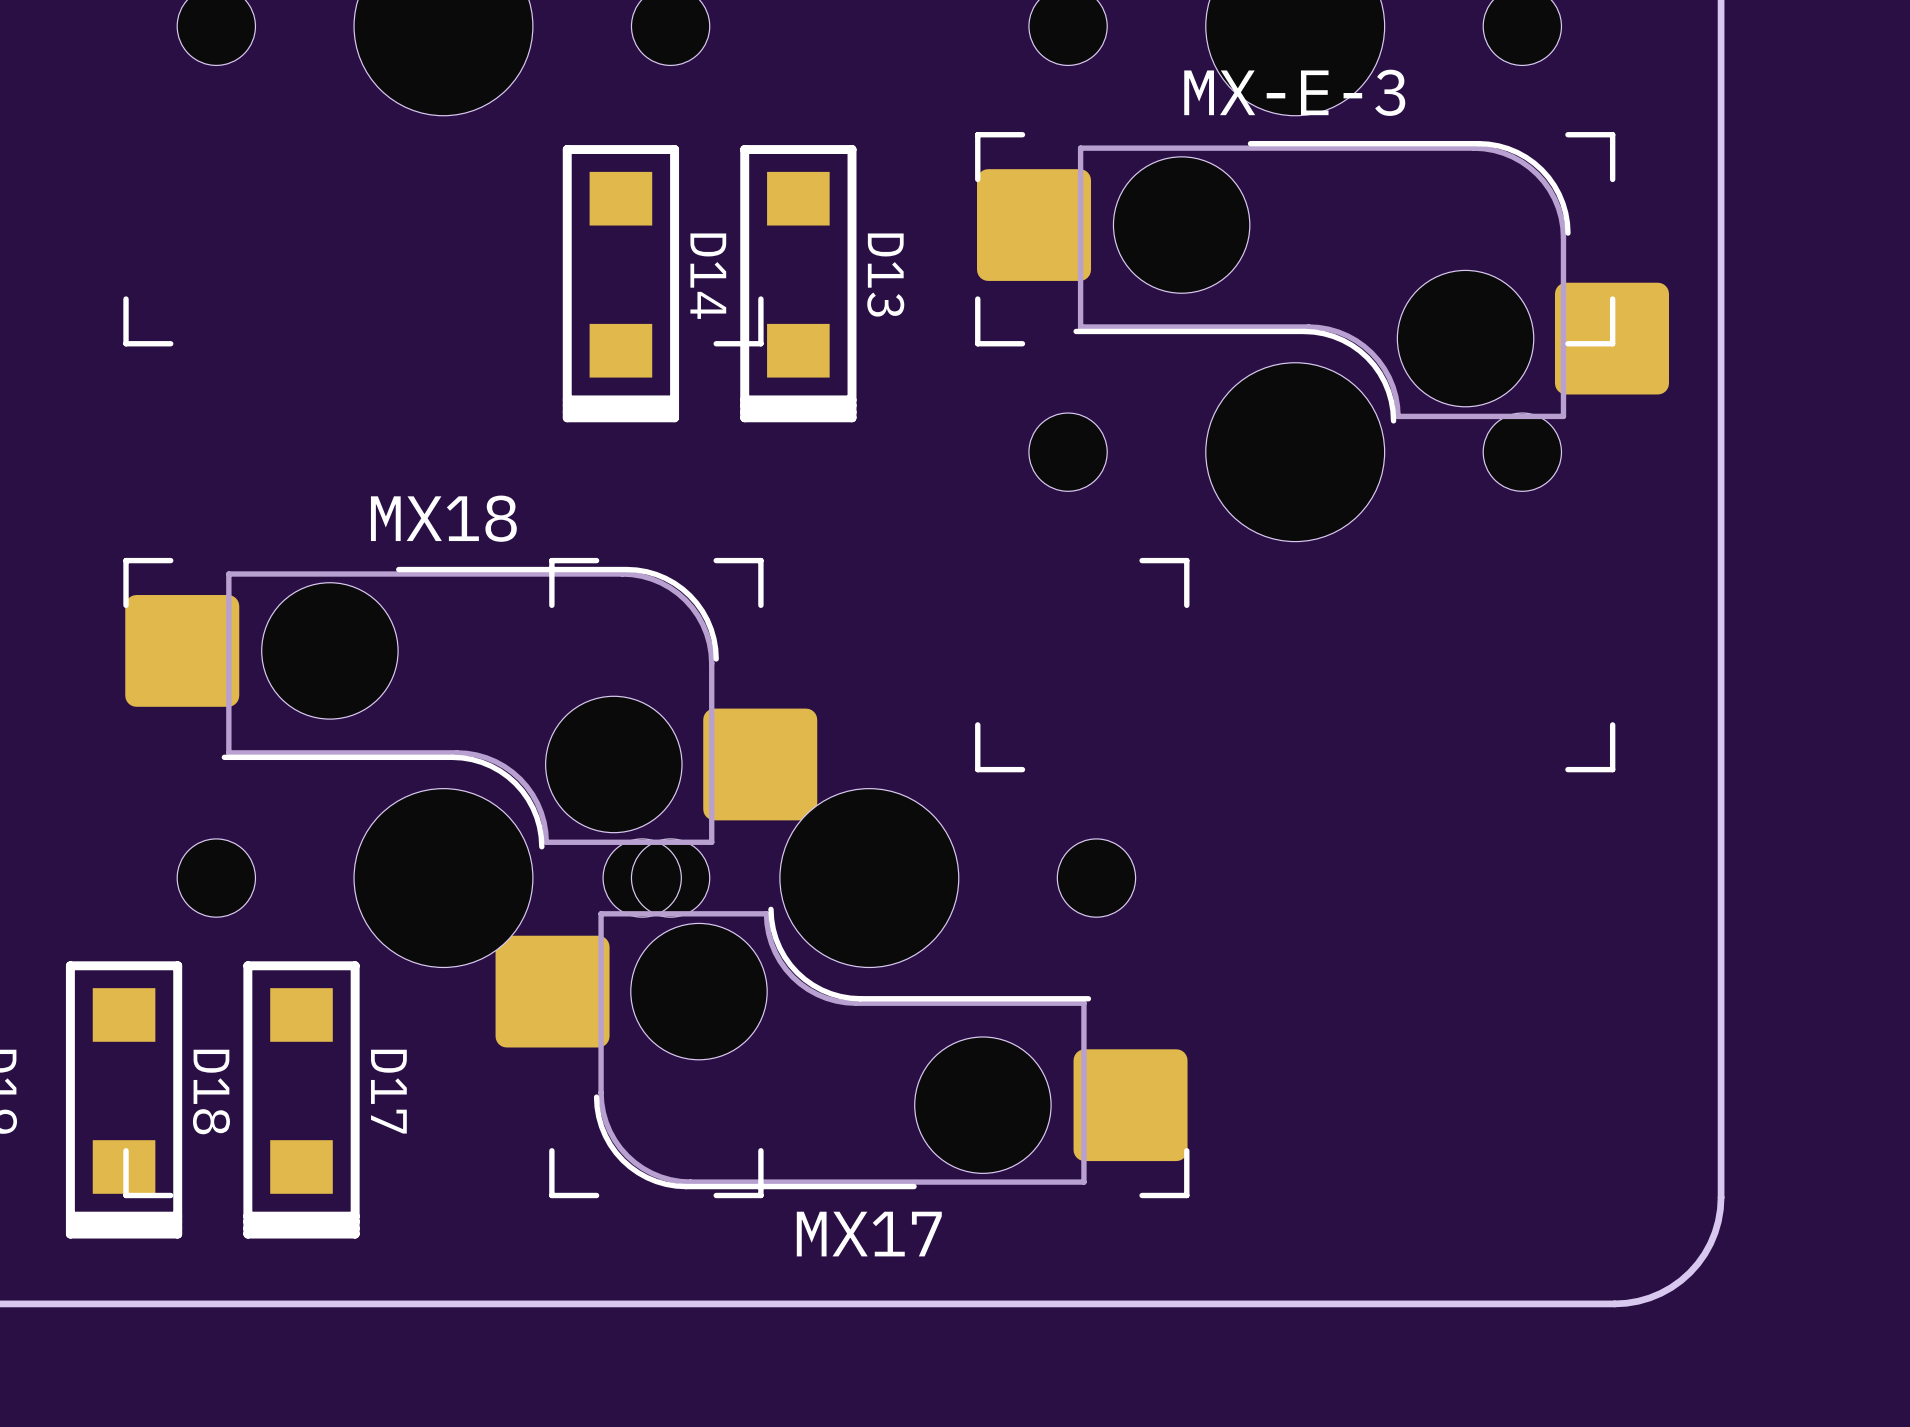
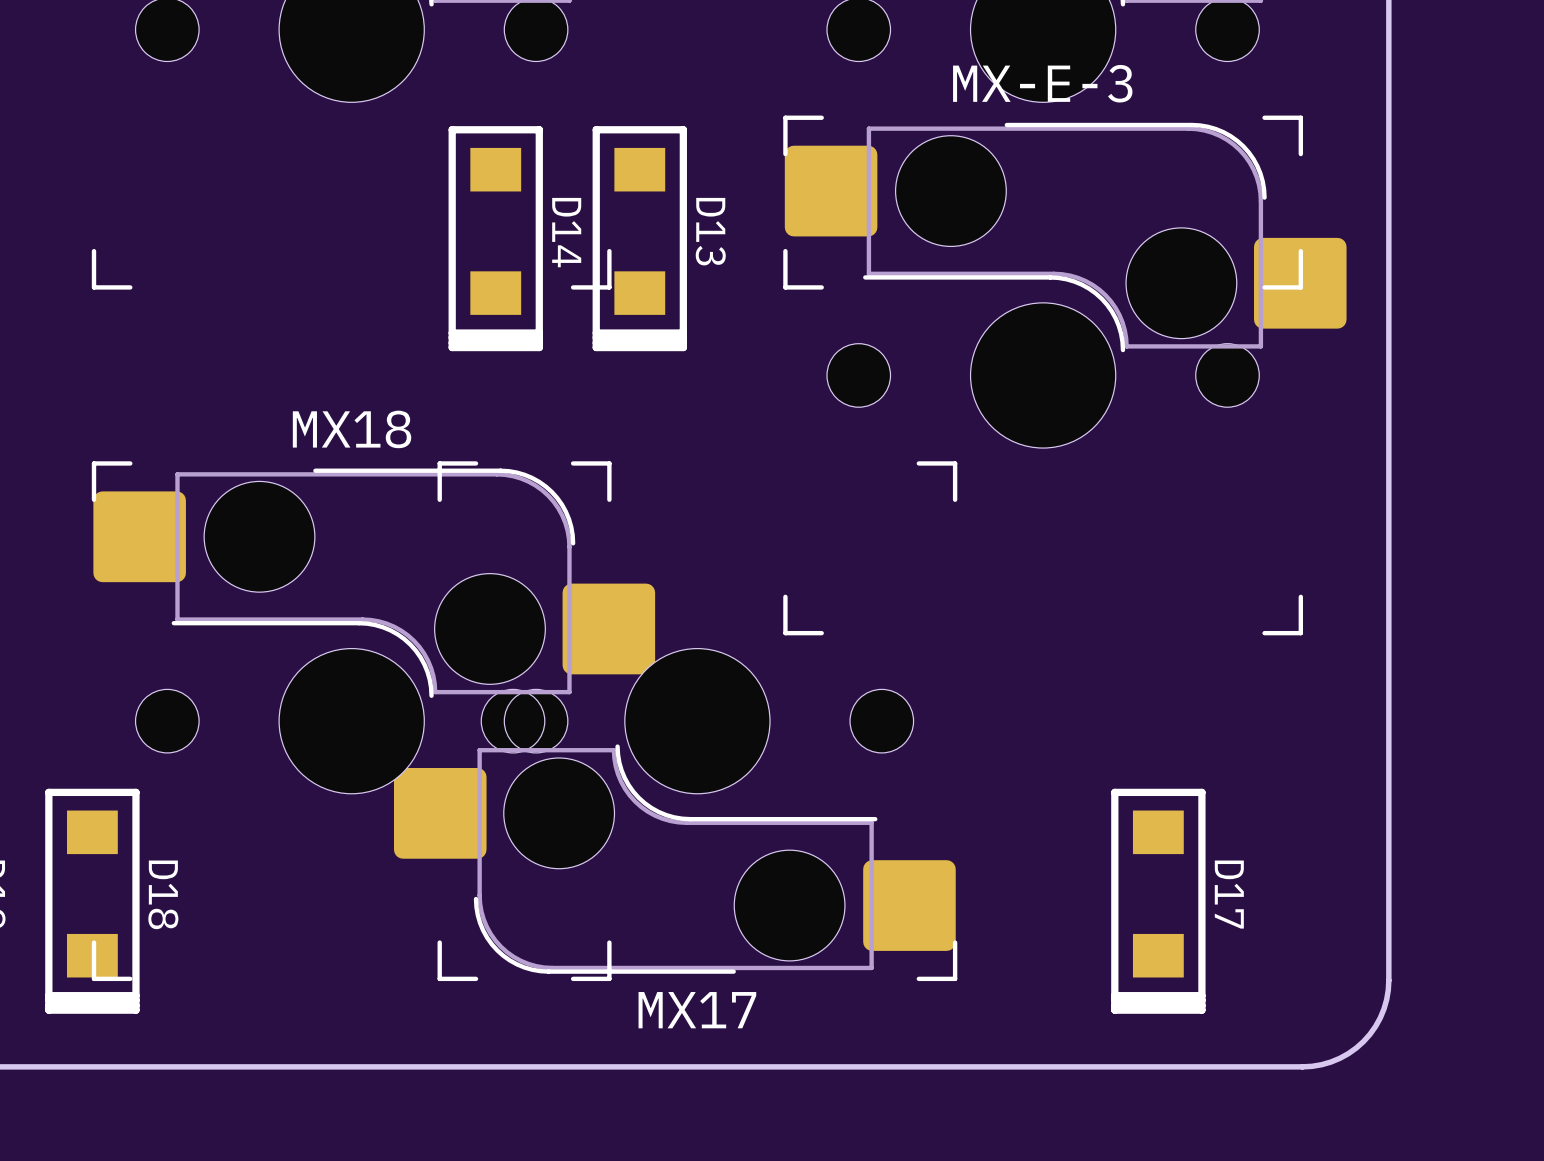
D17 position: (301, 1099) -> (1158, 901)

